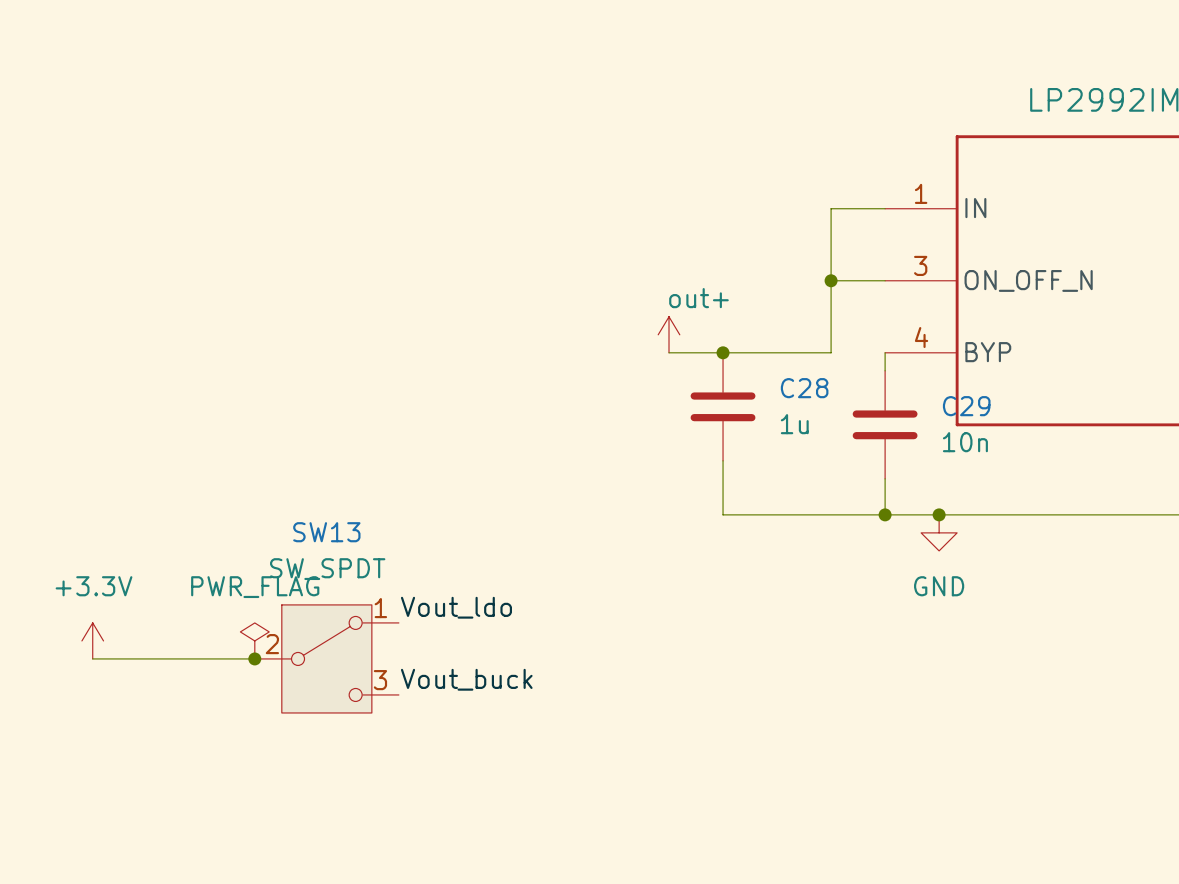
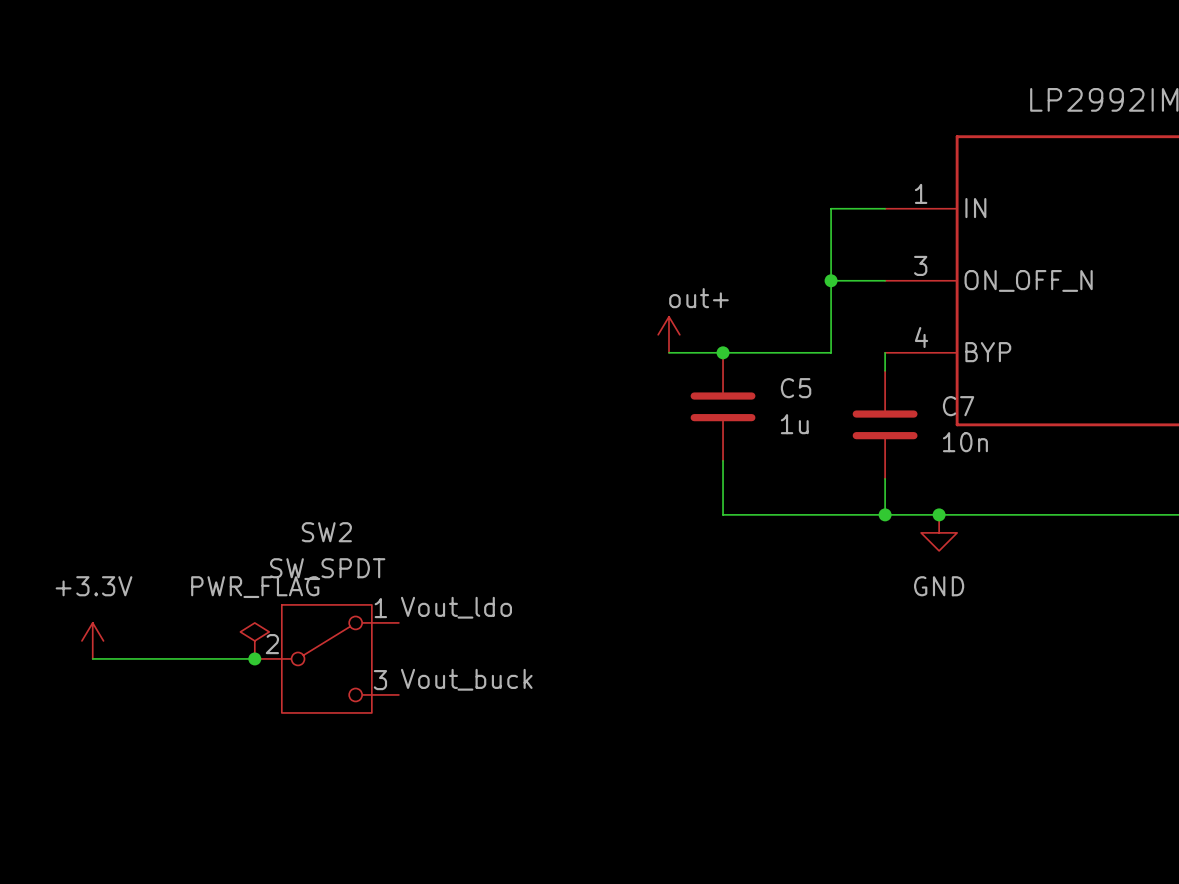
C28 name: C28 (804, 388) -> C5 (796, 388)
C29 name: C29 (966, 406) -> C7 (958, 406)
SW13 name: SW13 (326, 532) -> SW2 (326, 532)

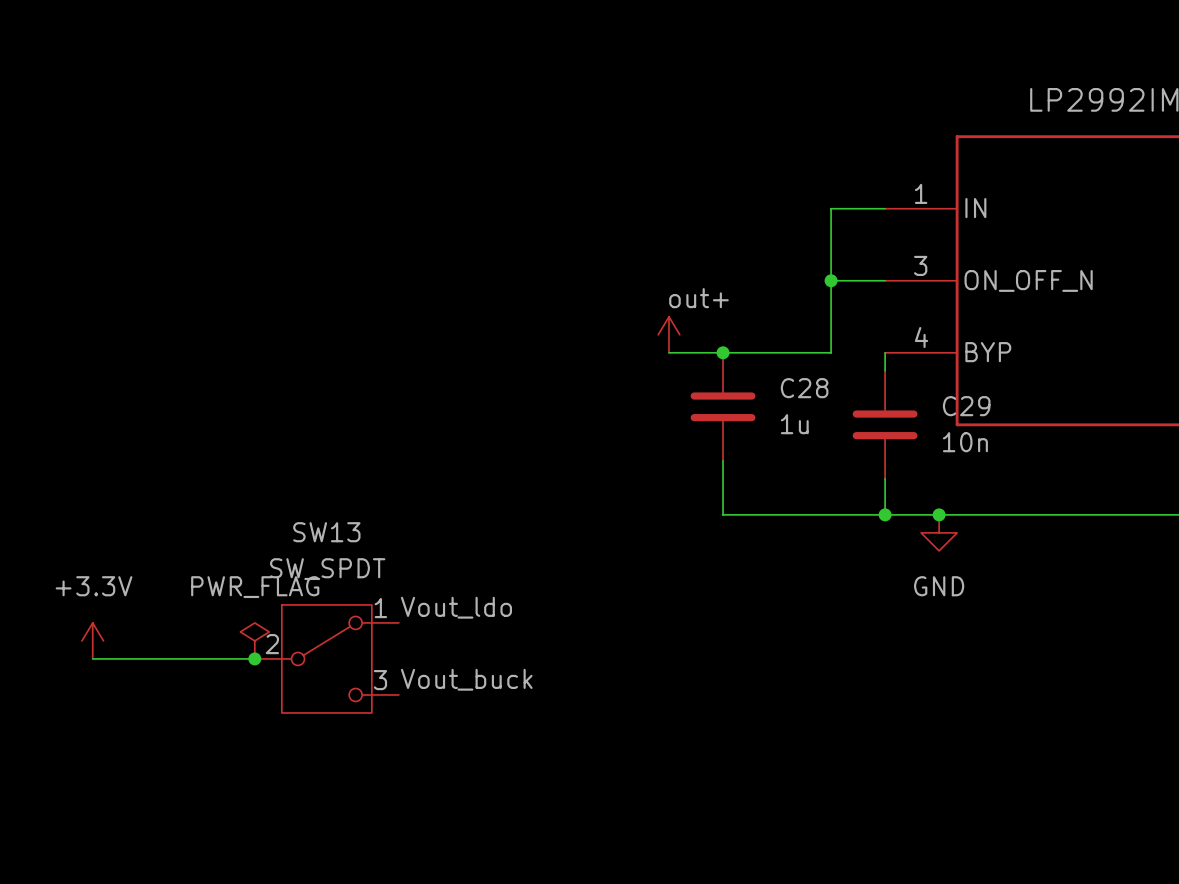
C5 name: C5 (796, 388) -> C28 (804, 388)
C7 name: C7 (958, 406) -> C29 (966, 406)
SW2 name: SW2 (326, 532) -> SW13 (326, 532)

